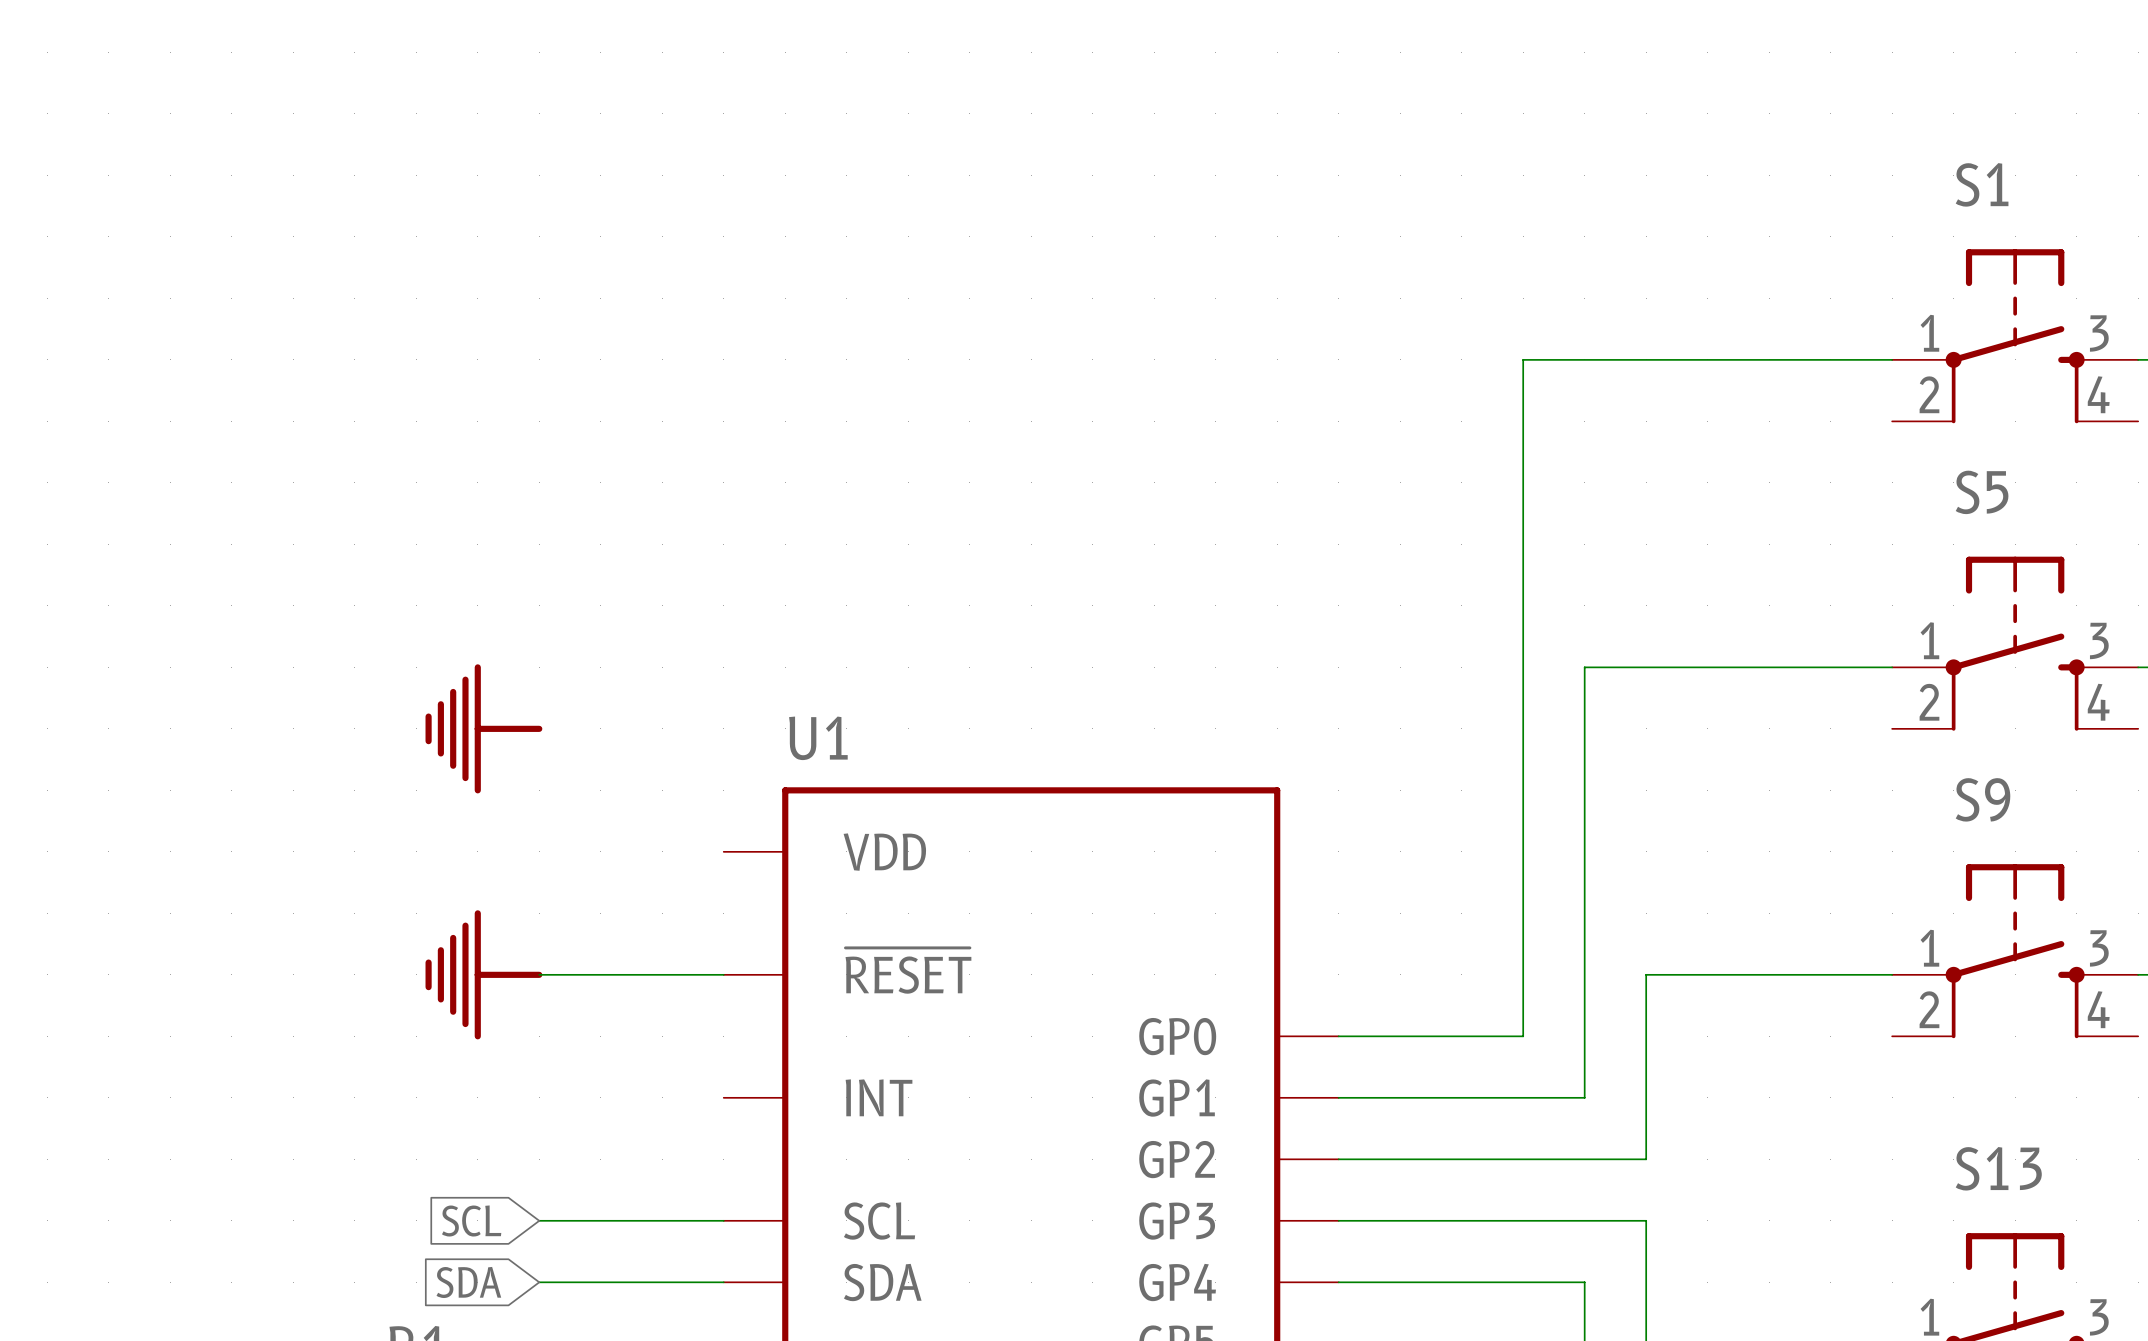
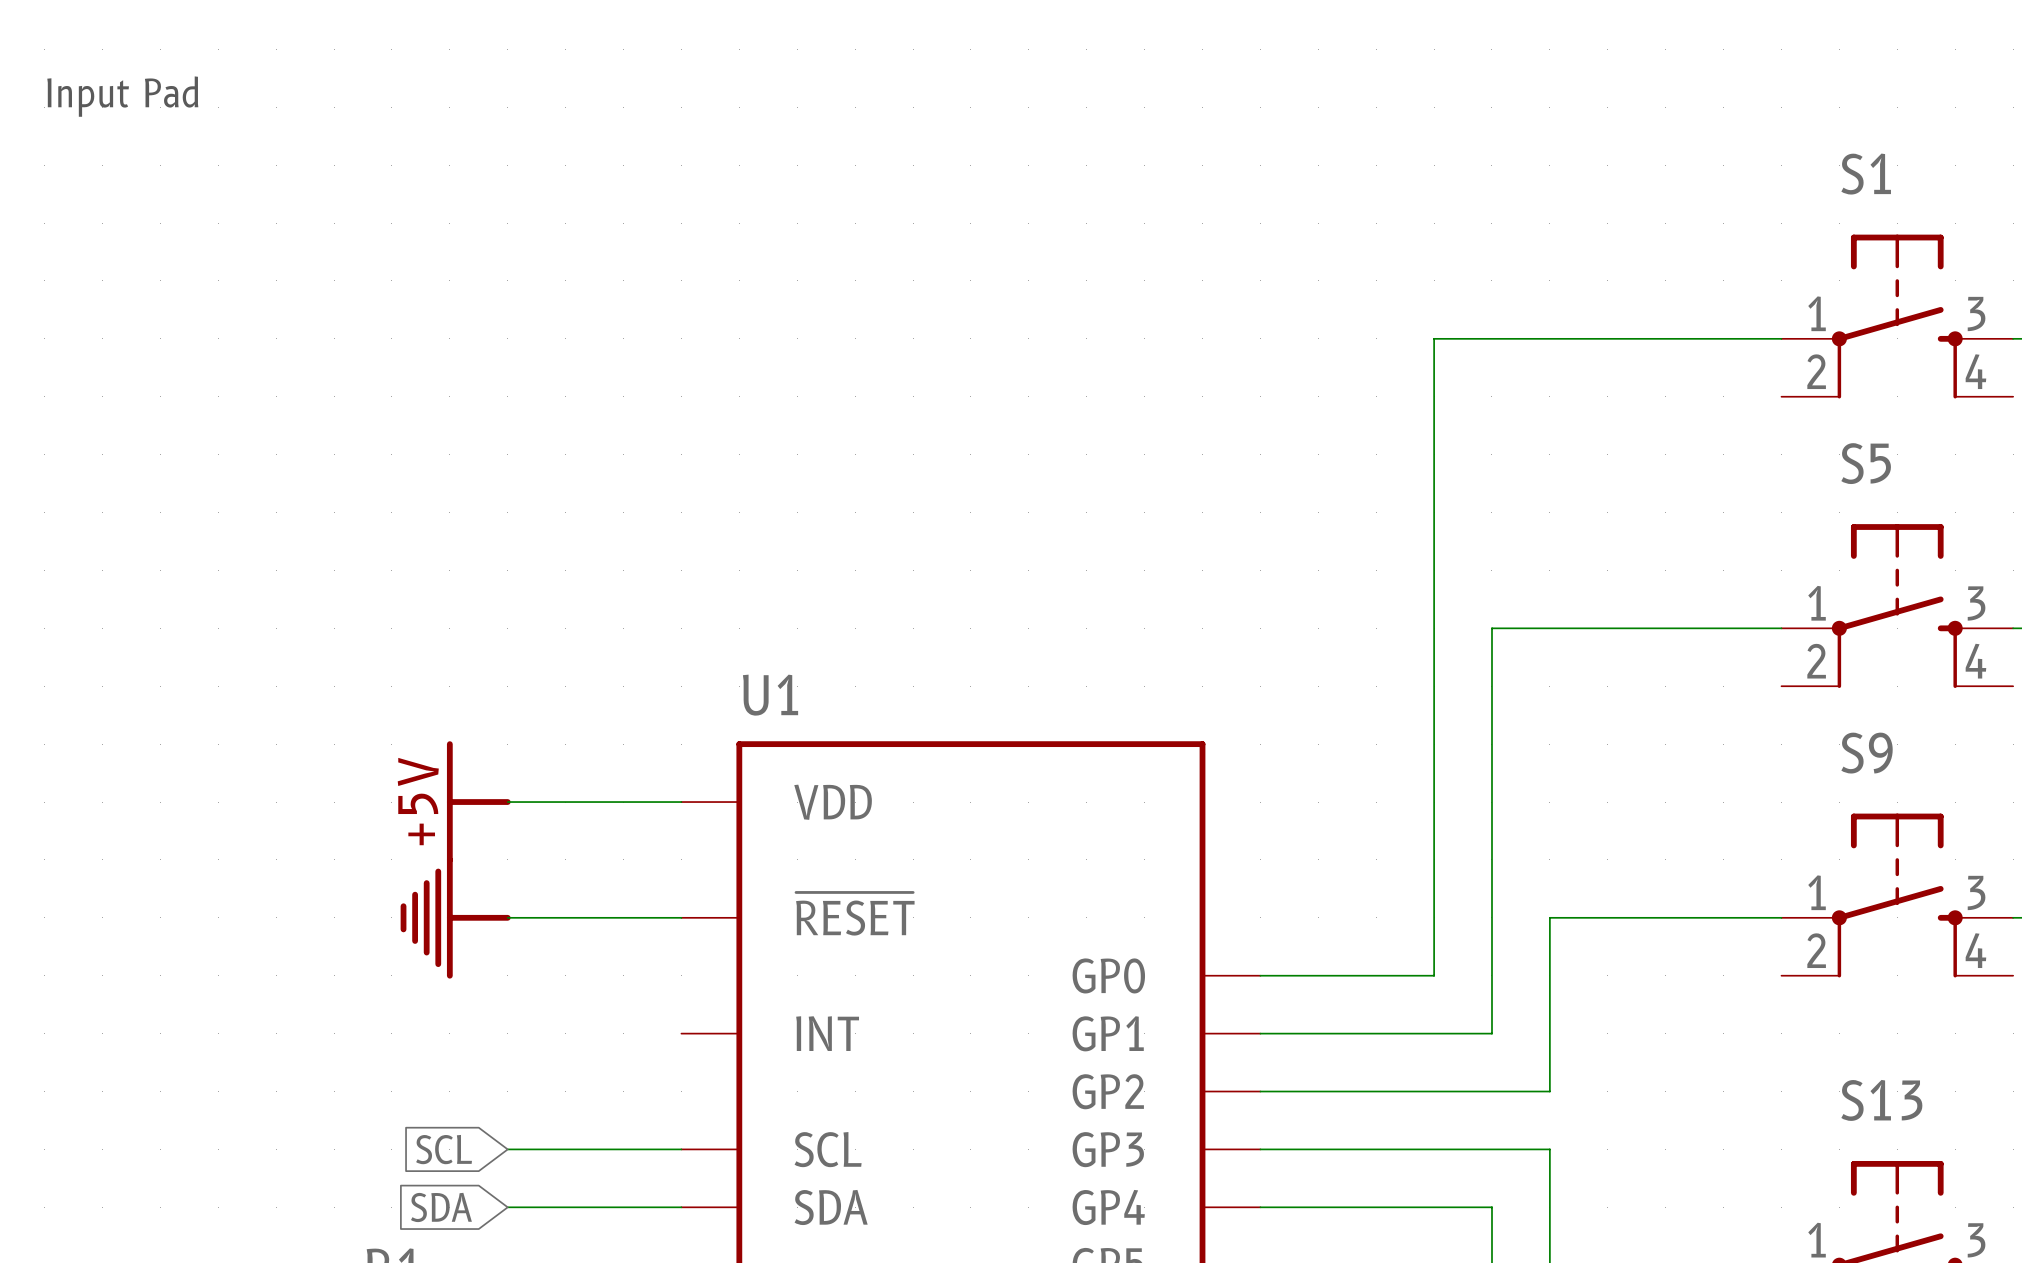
text: none -> Input Pad (122, 96)
power symbol: (483, 728) -> none
power symbol: none -> (478, 802)
wire: none -> (507, 802) (681, 802)

